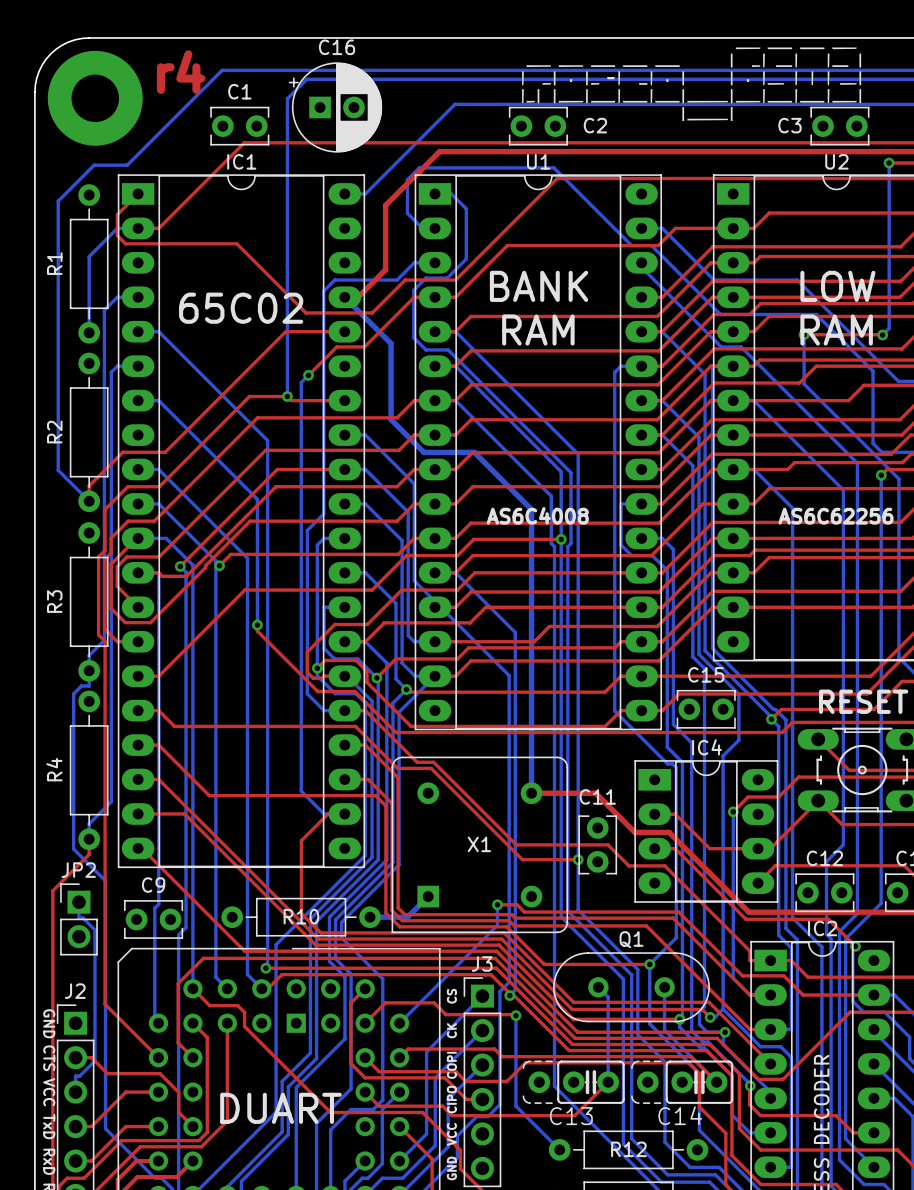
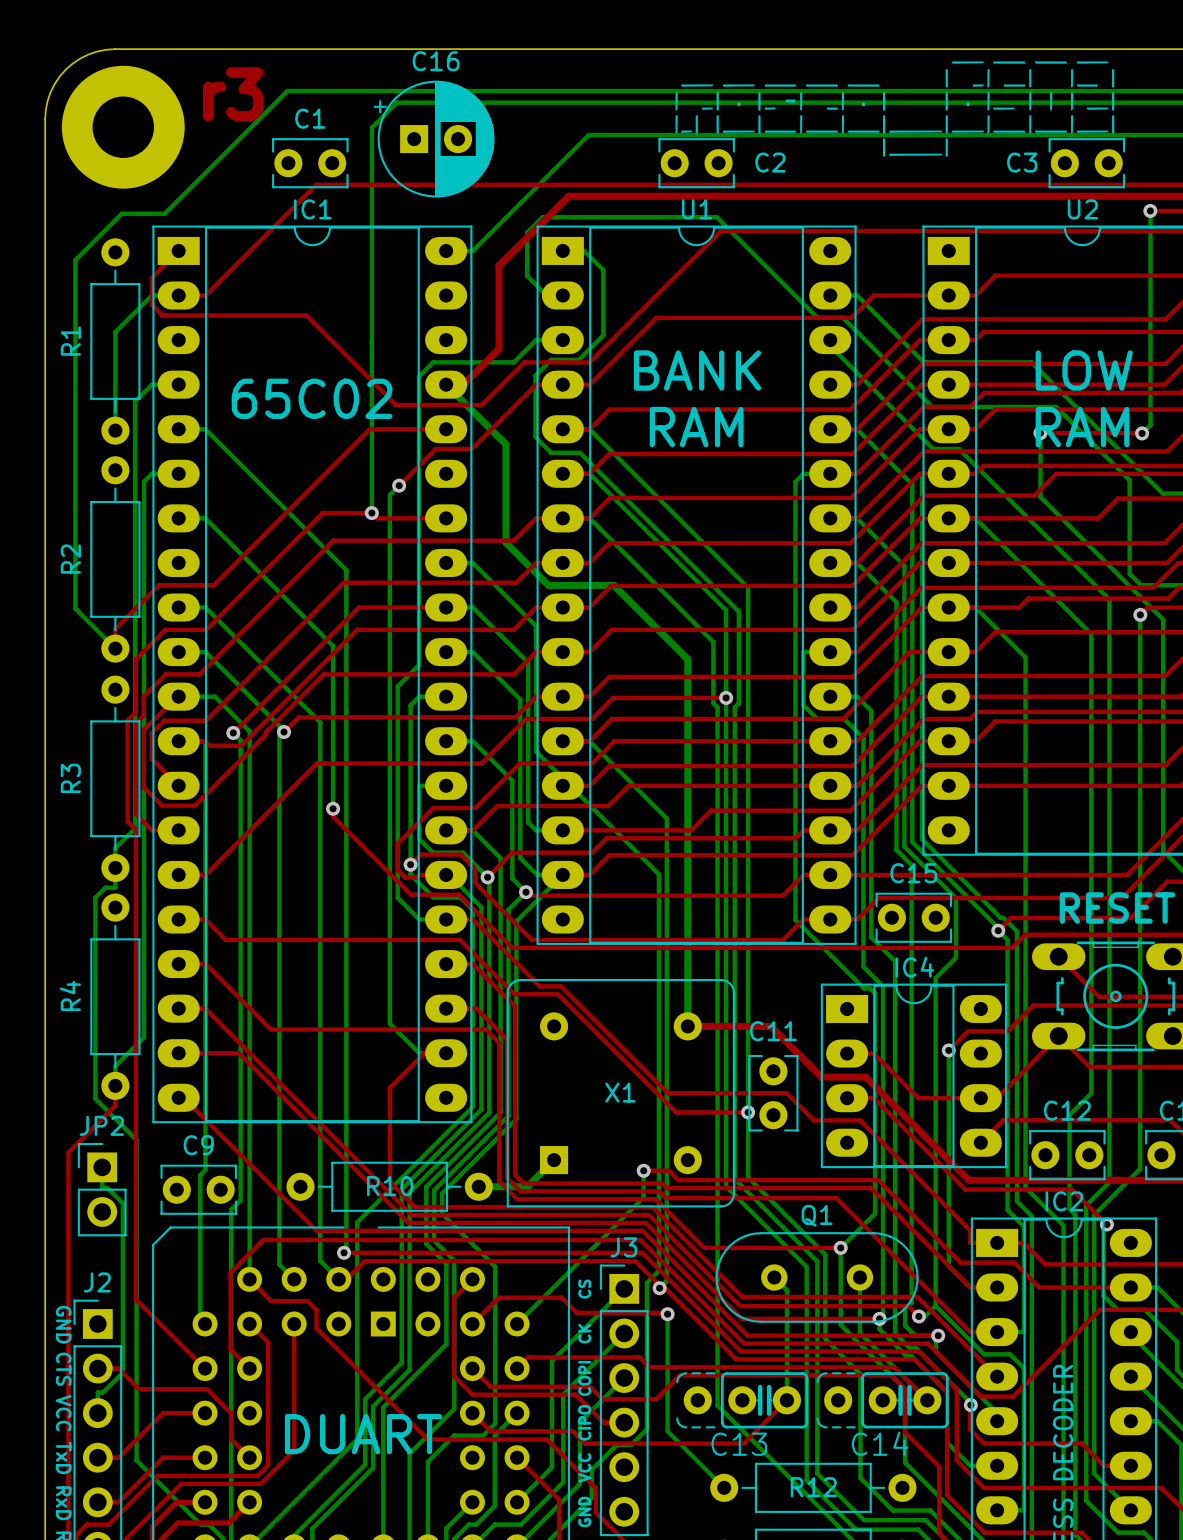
text: r4 (181, 72) -> r3 (233, 94)
text: AS6C4008 (537, 515) -> none
text: AS6C62256 (835, 516) -> none

